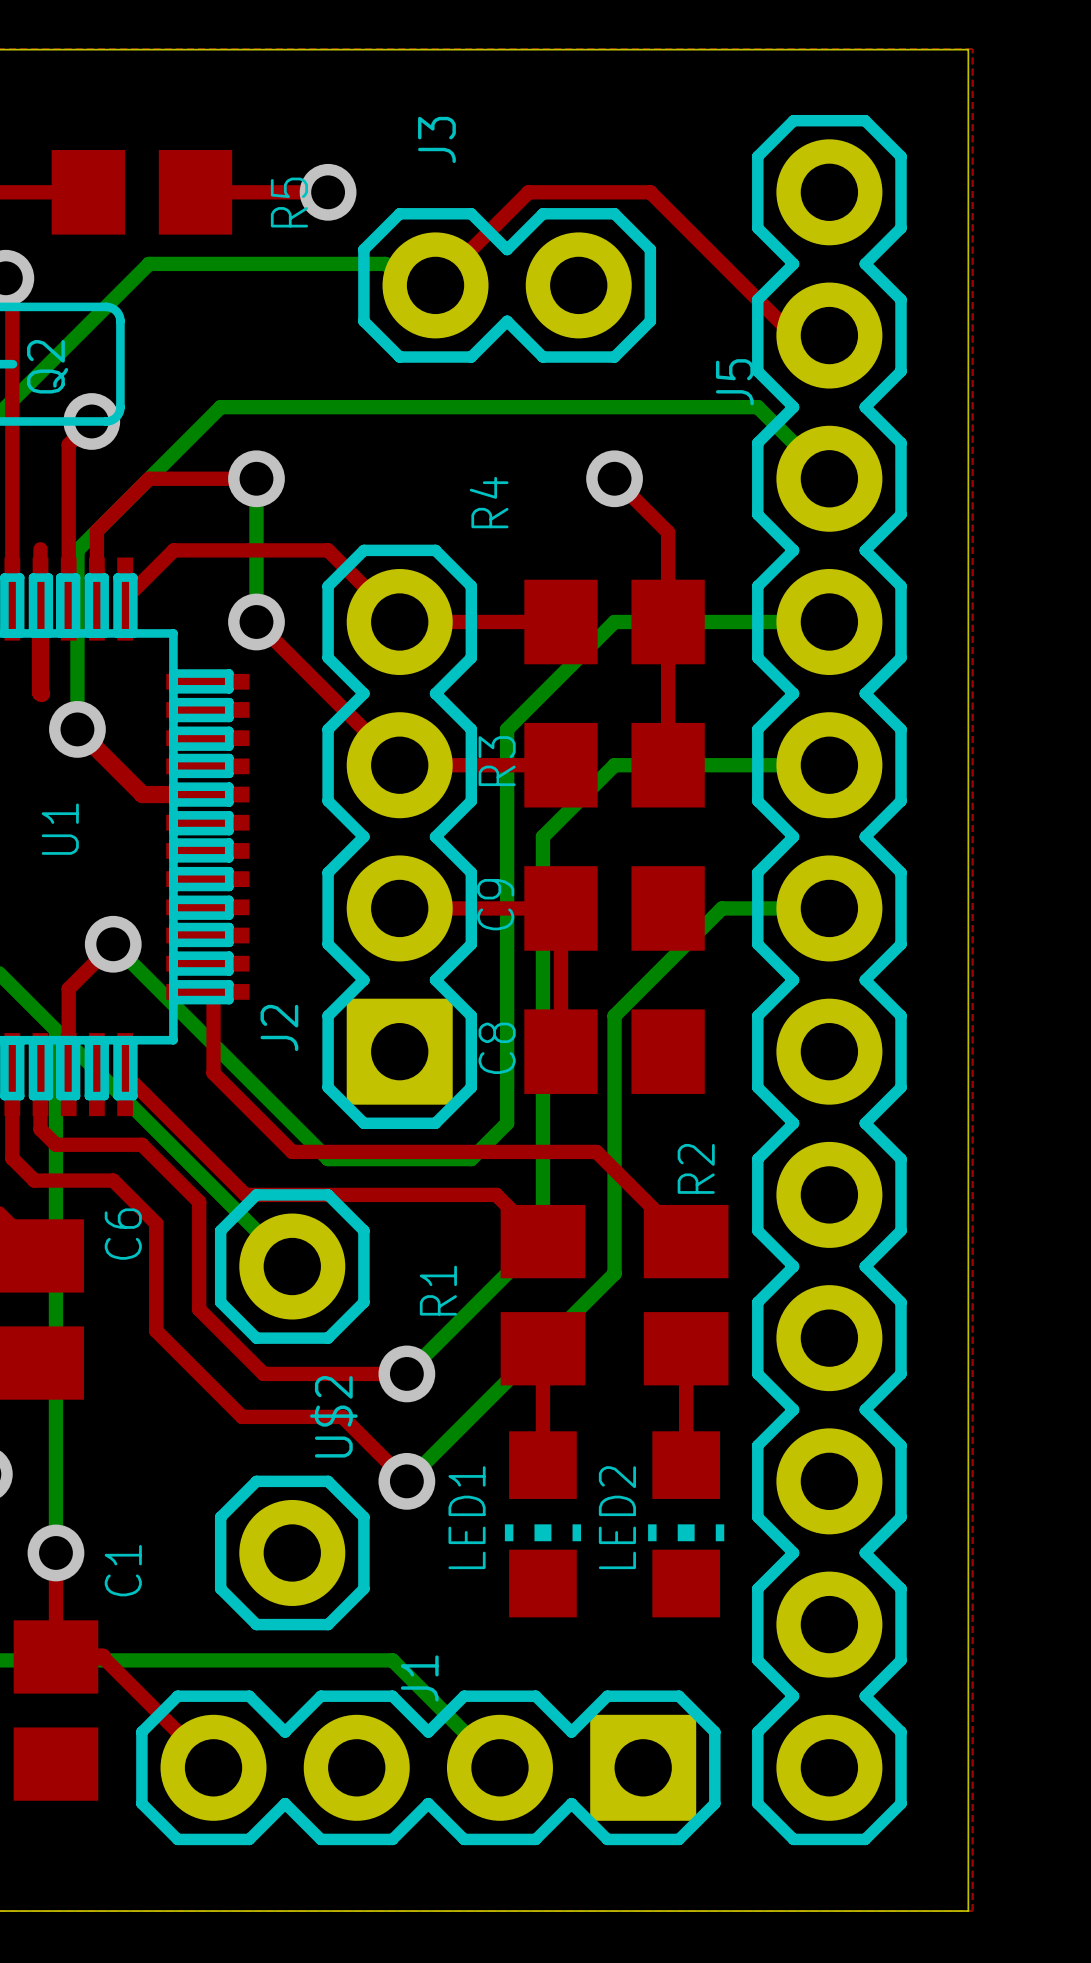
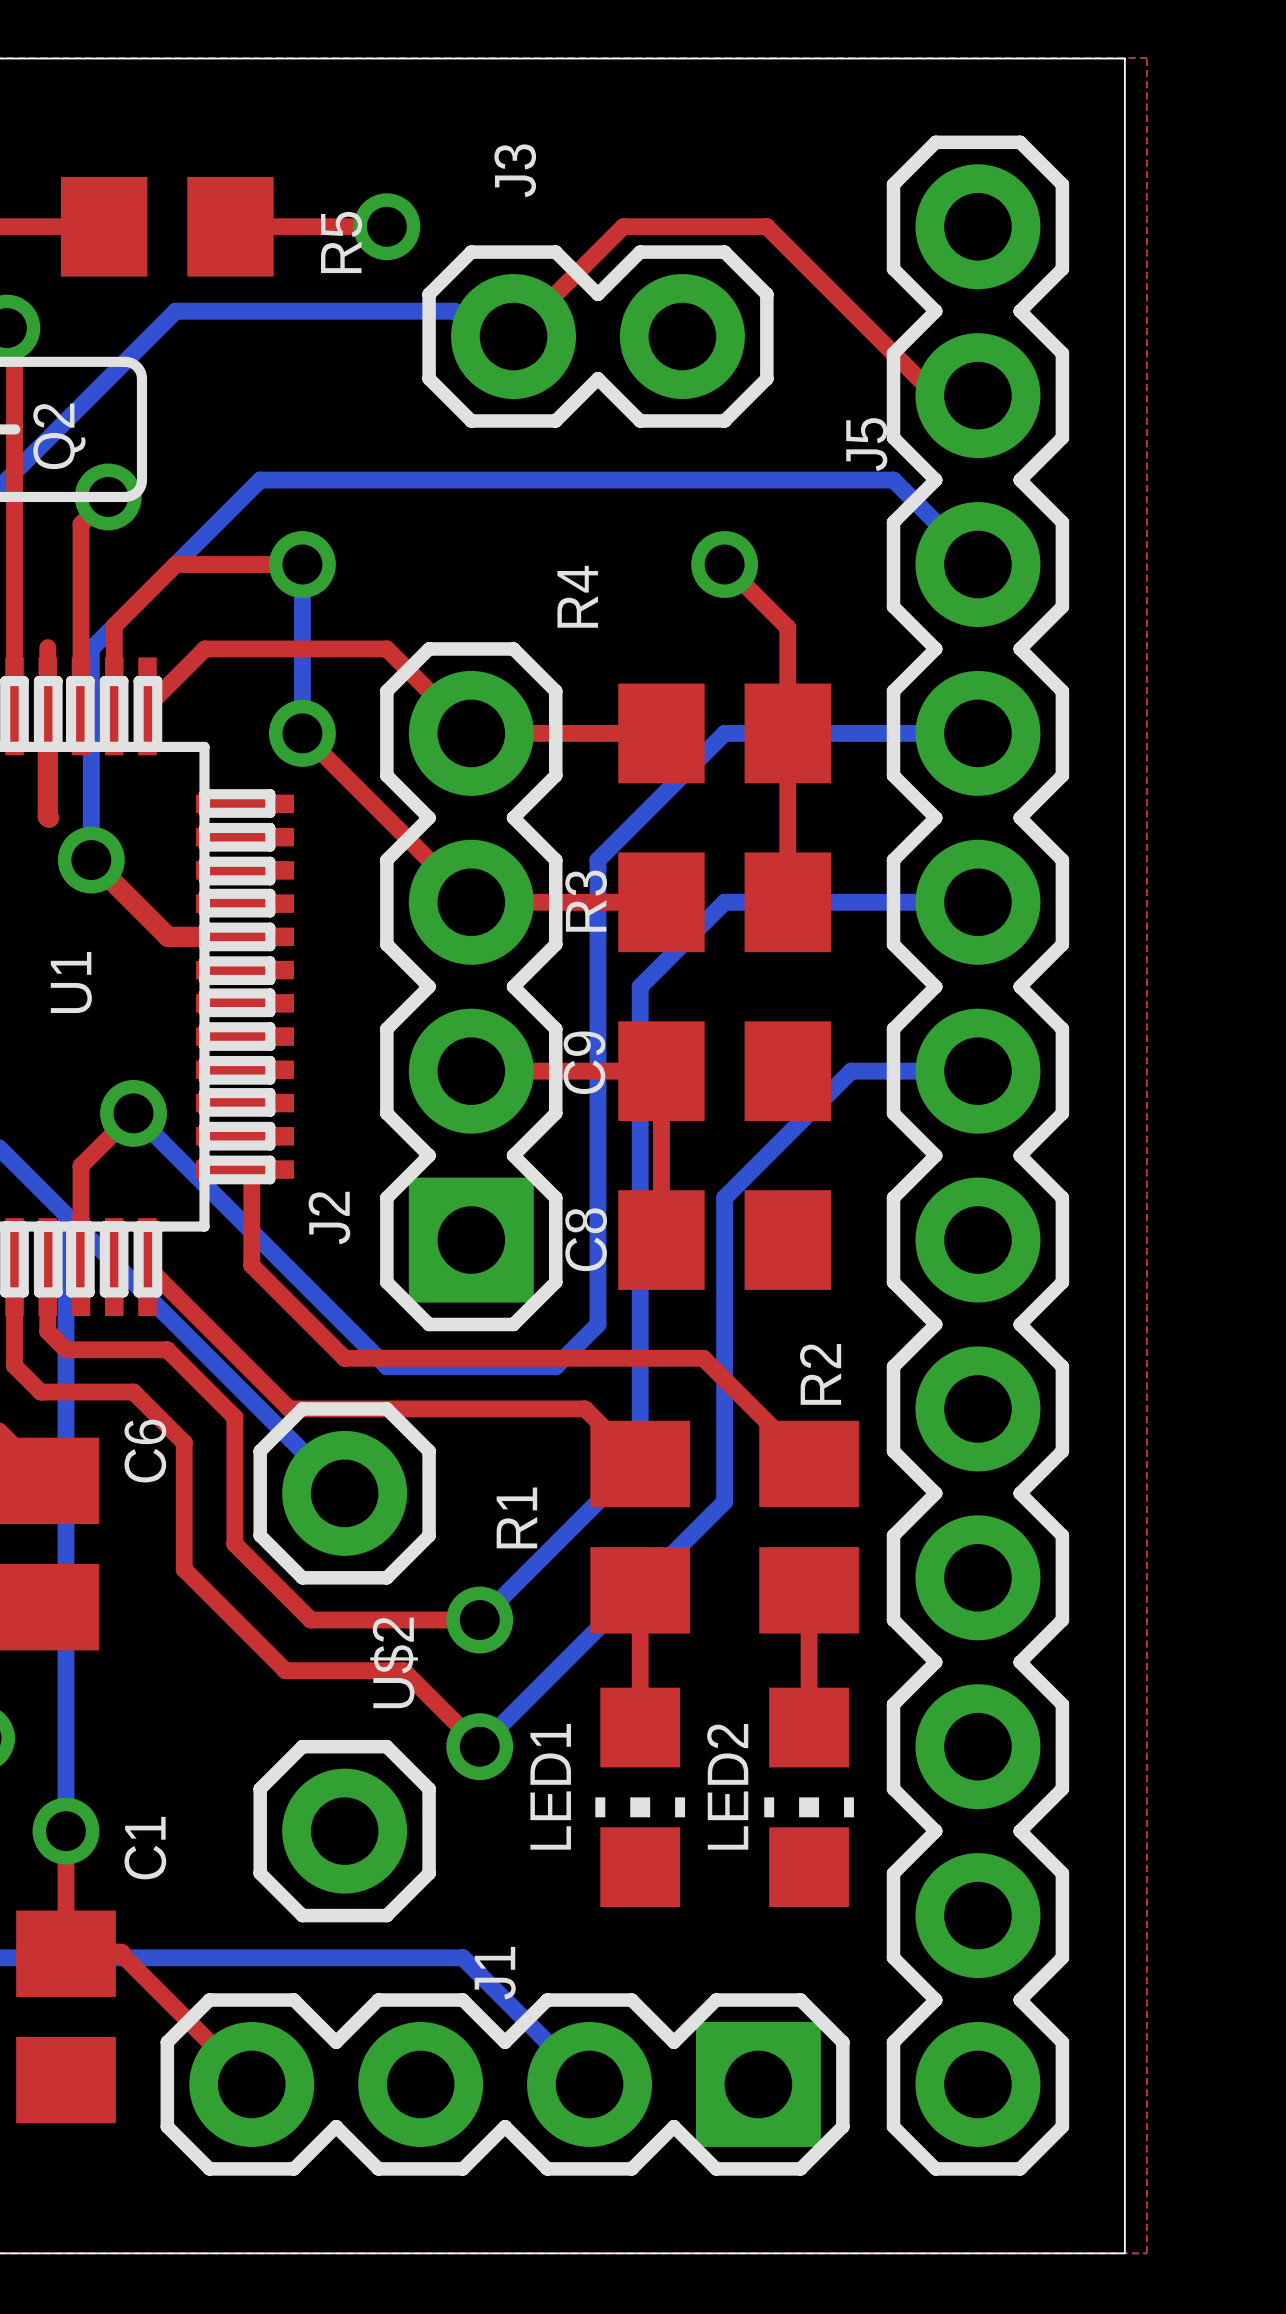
board edge: (954, 49) (968, 49) (968, 1911) (954, 1911) -> (1124, 58) (1124, 2253)

